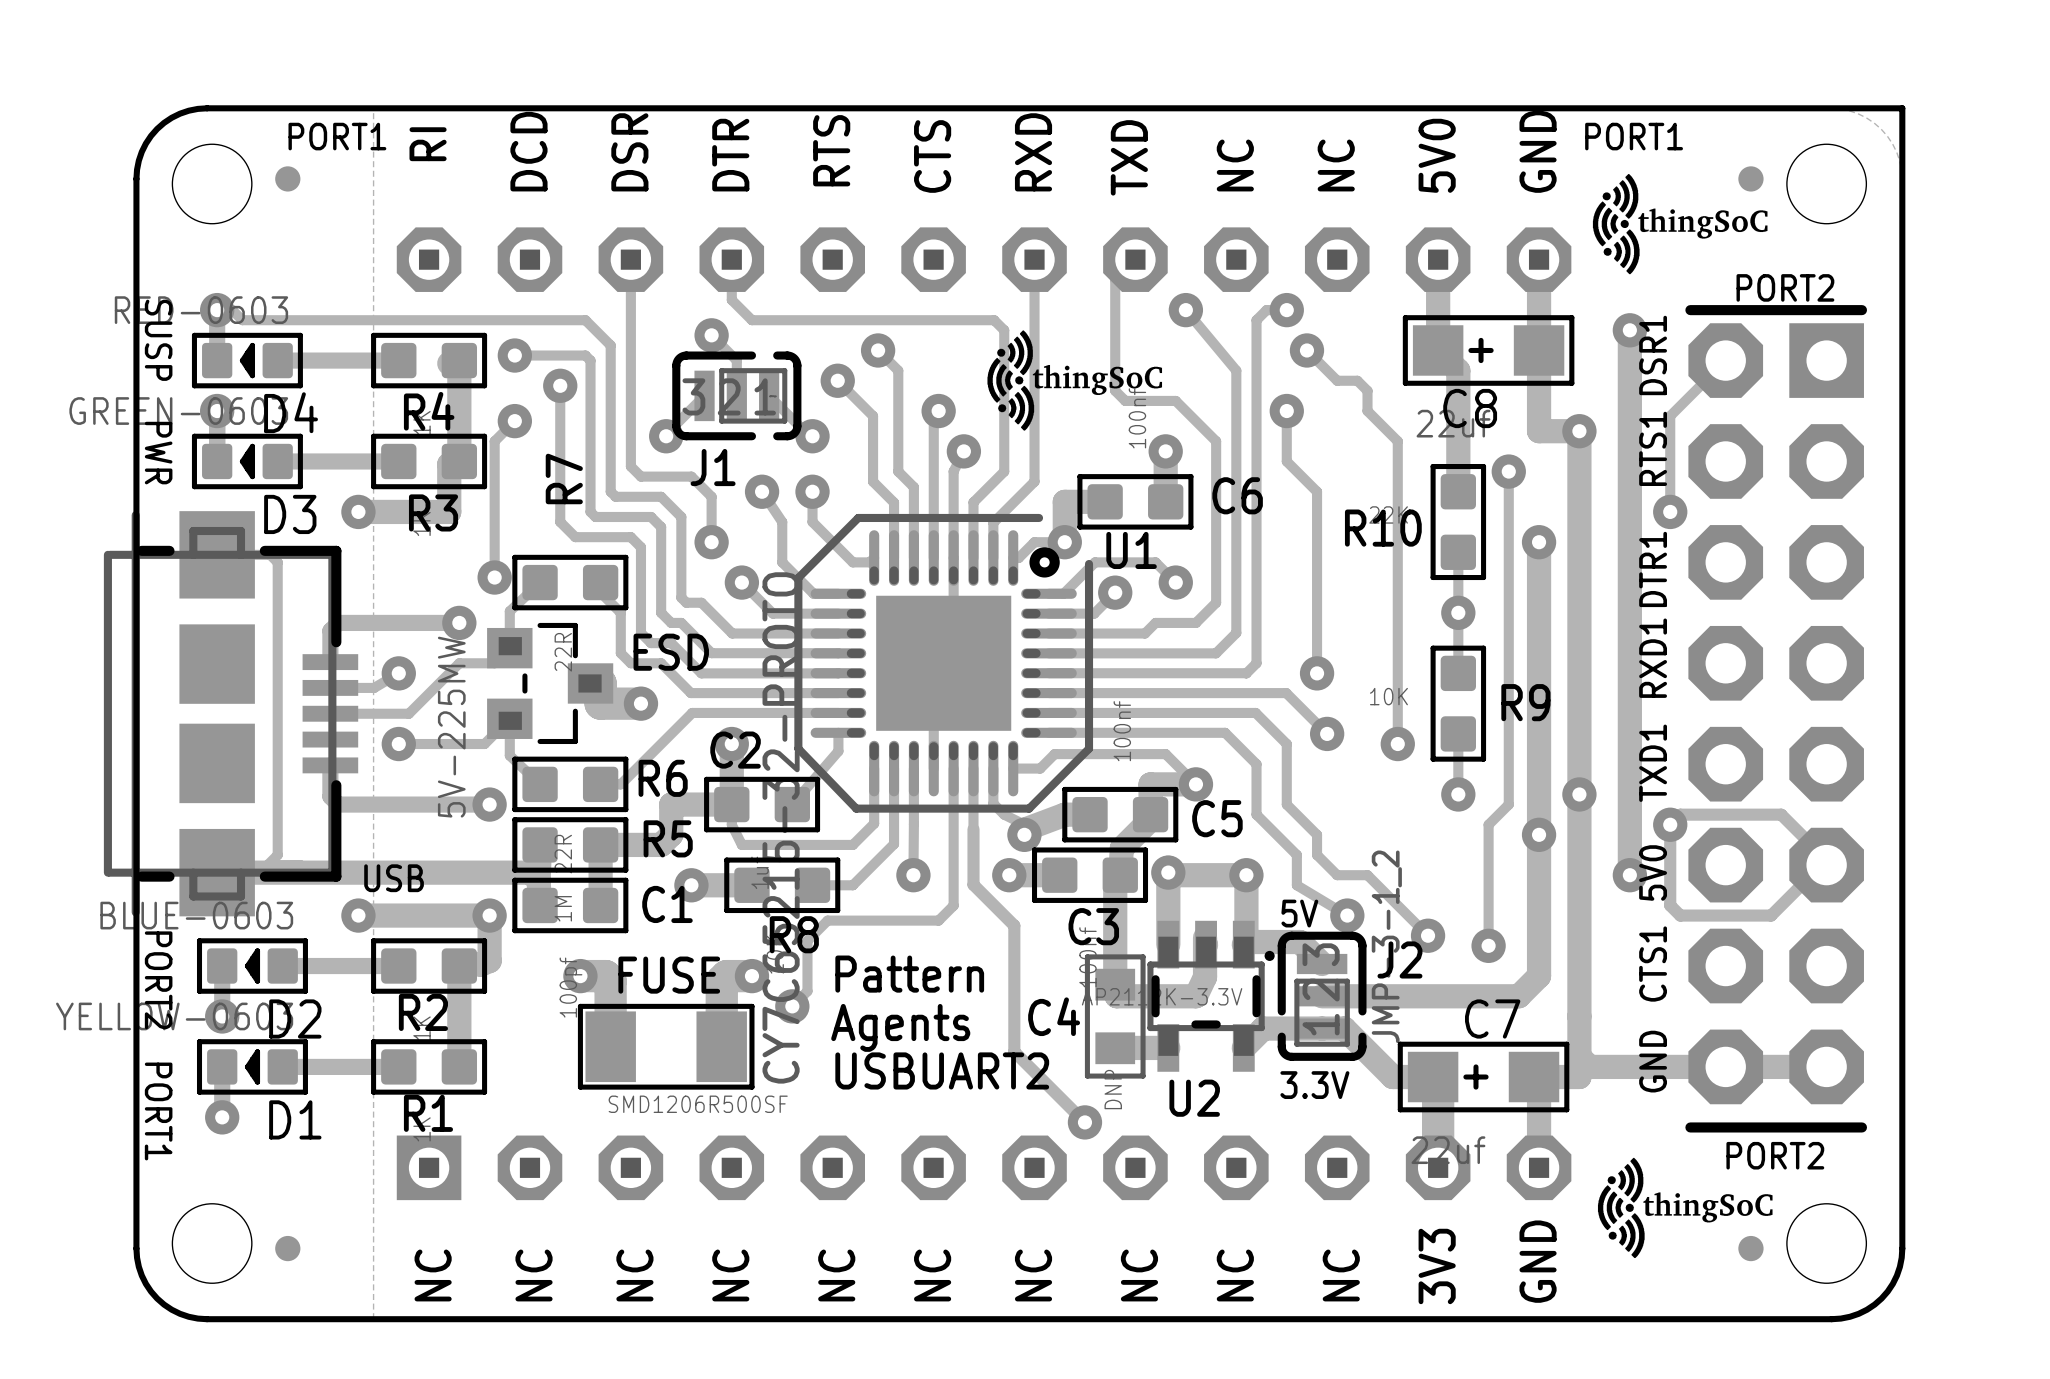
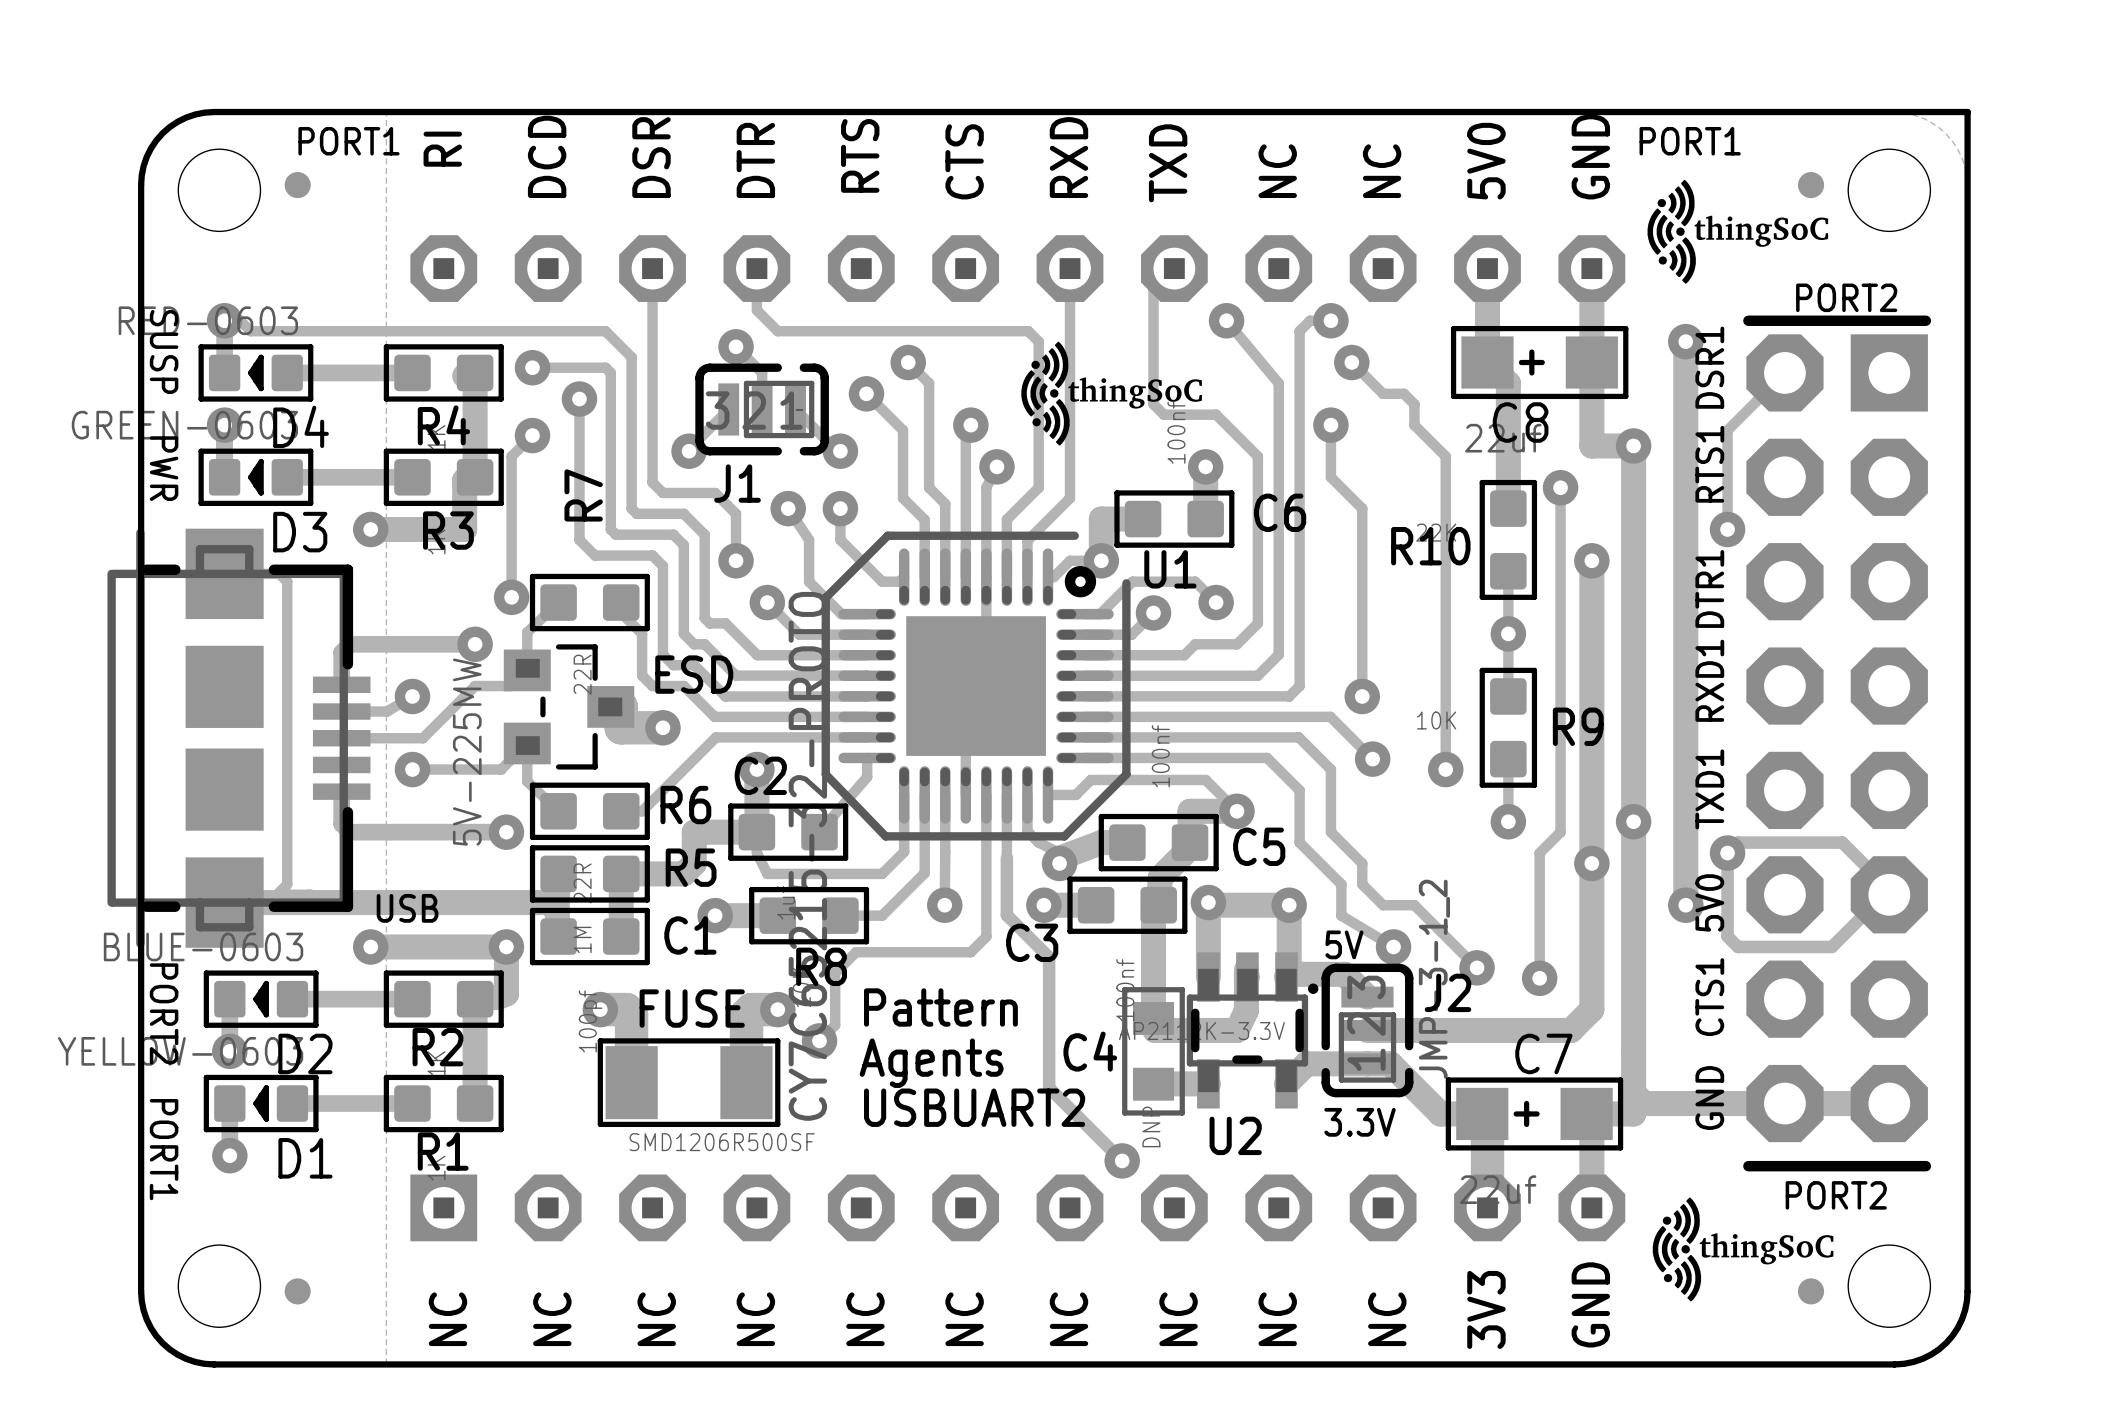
C3 name position: C3 (1093, 926) -> C3 (1032, 942)

